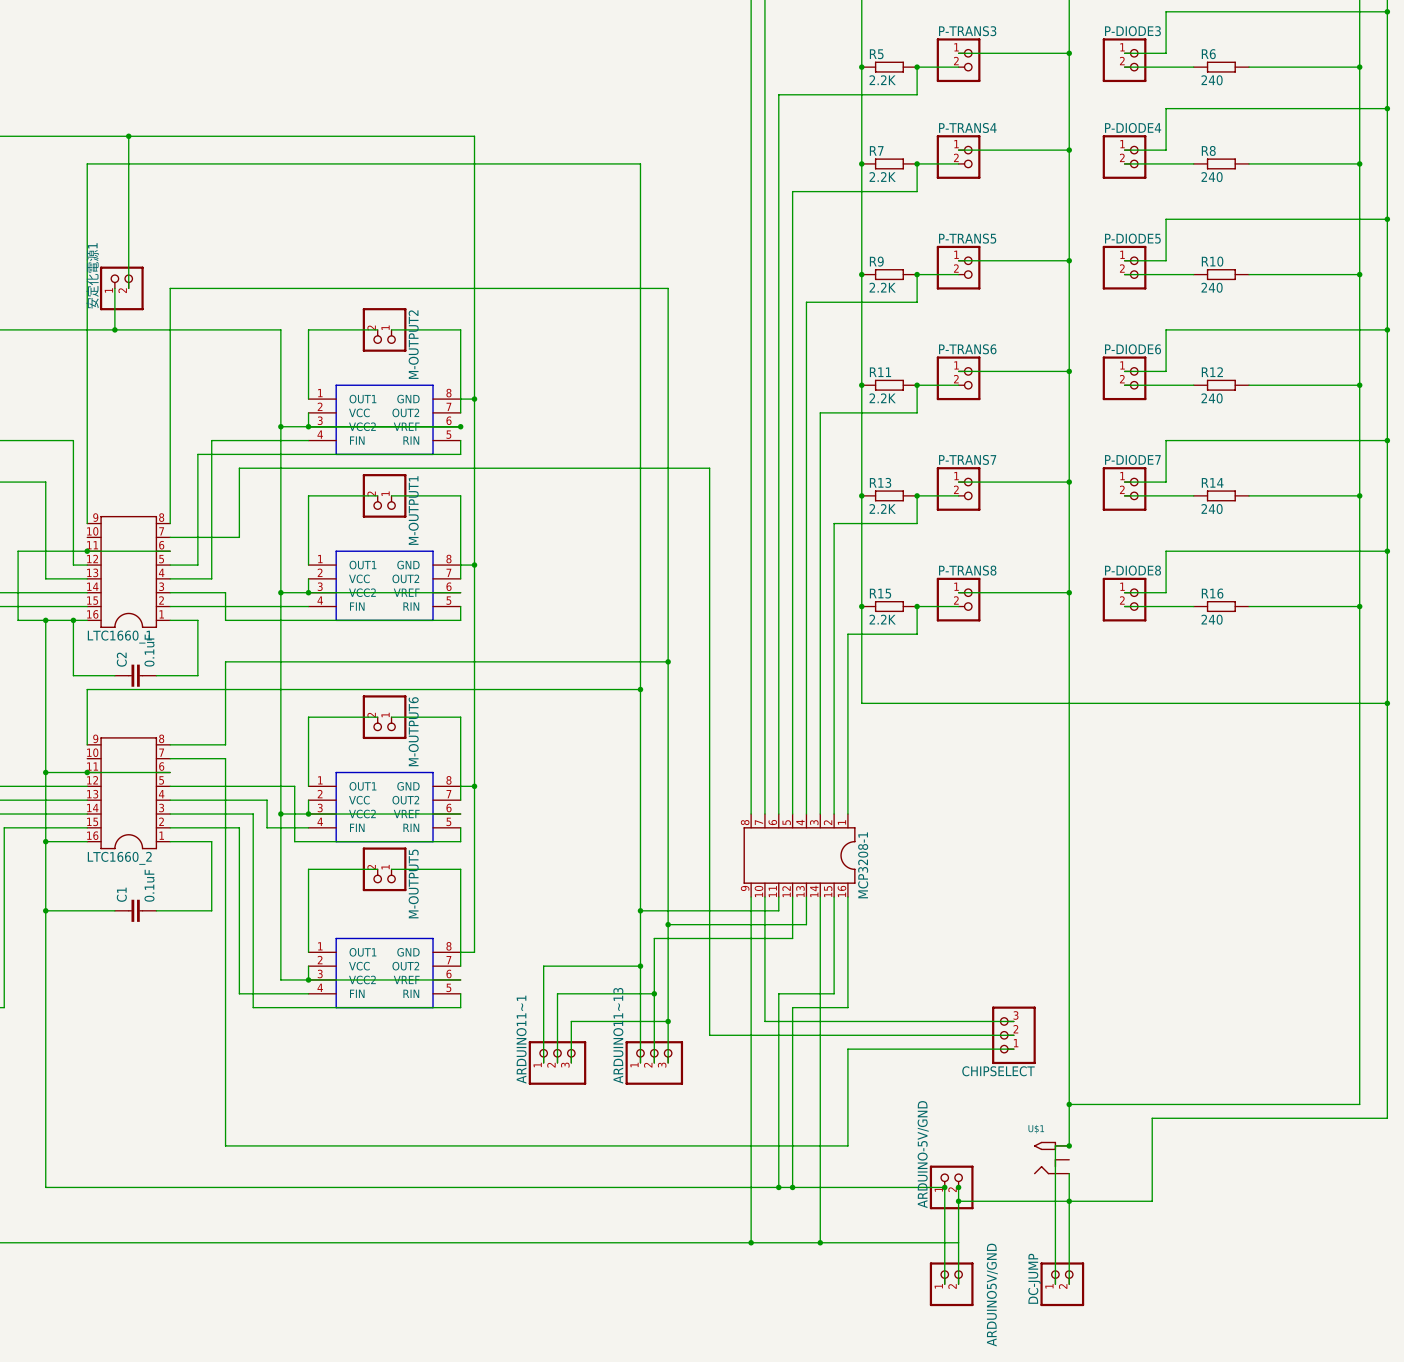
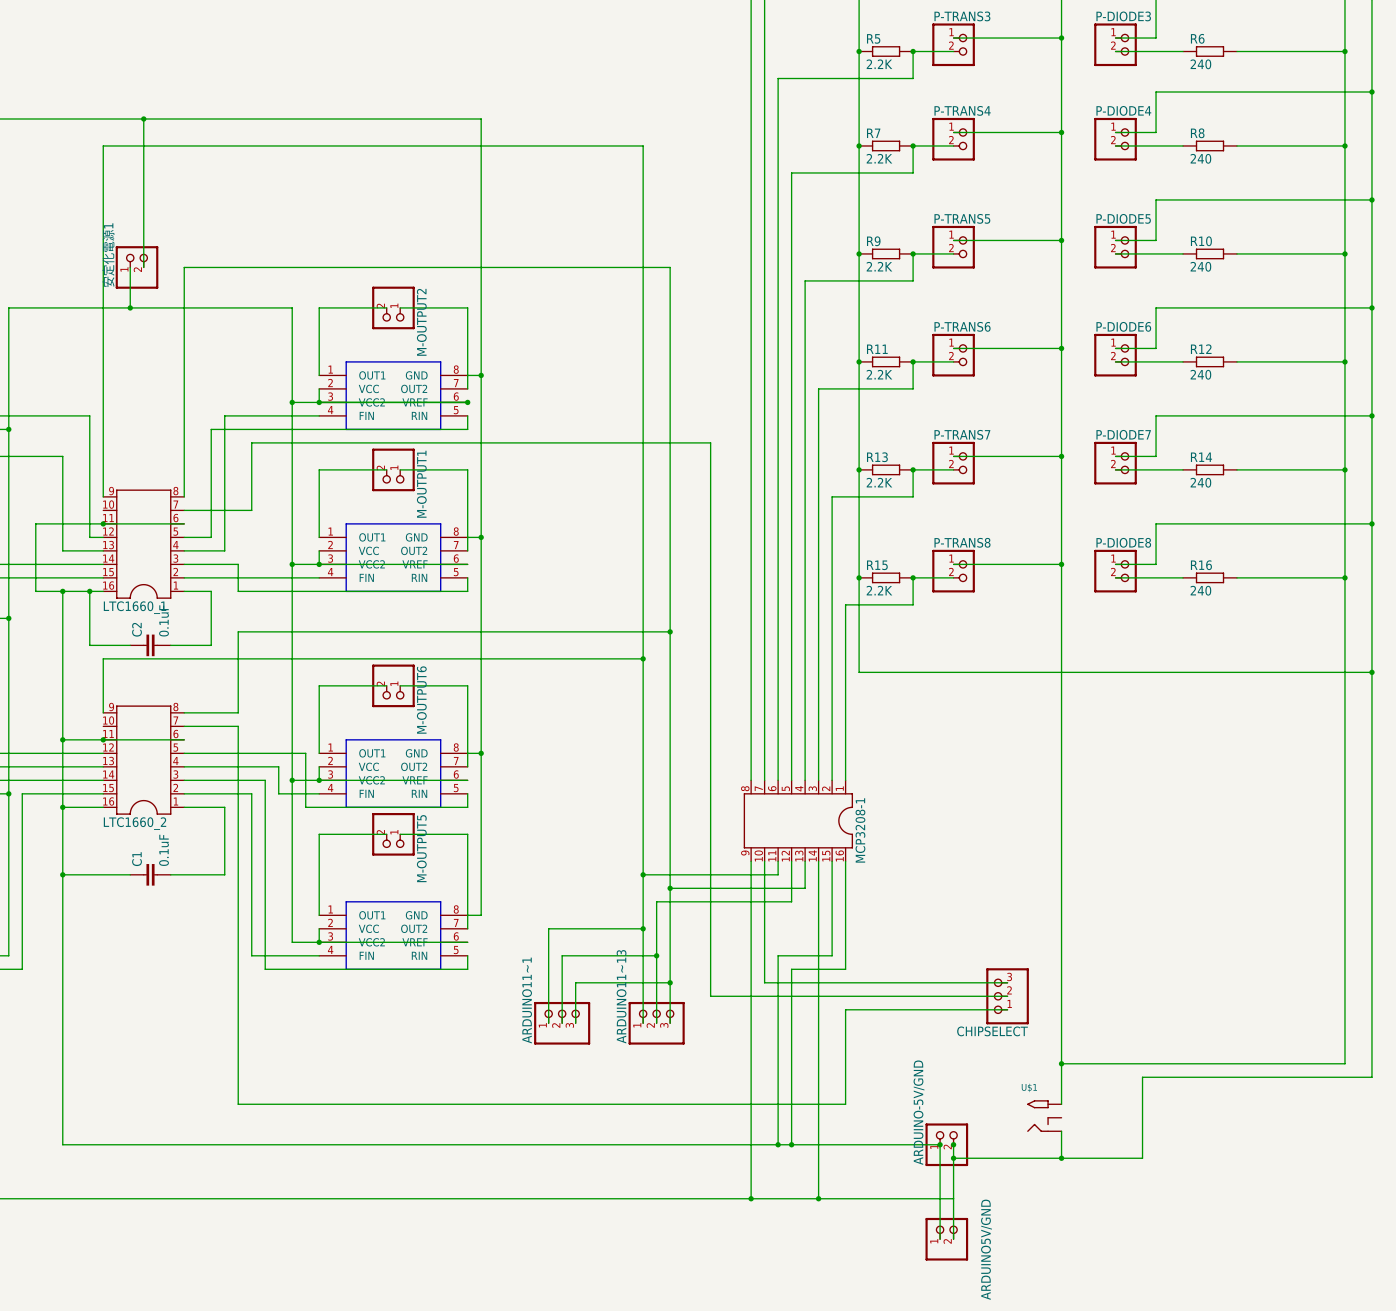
wire: (1069, 1145) (1055, 1145) (1055, 1284) -> none
junction: (1069, 1145) -> none
wire: (1069, 1201) (1069, 1284) -> none
DC-JUMP: (1062, 1284) -> none

